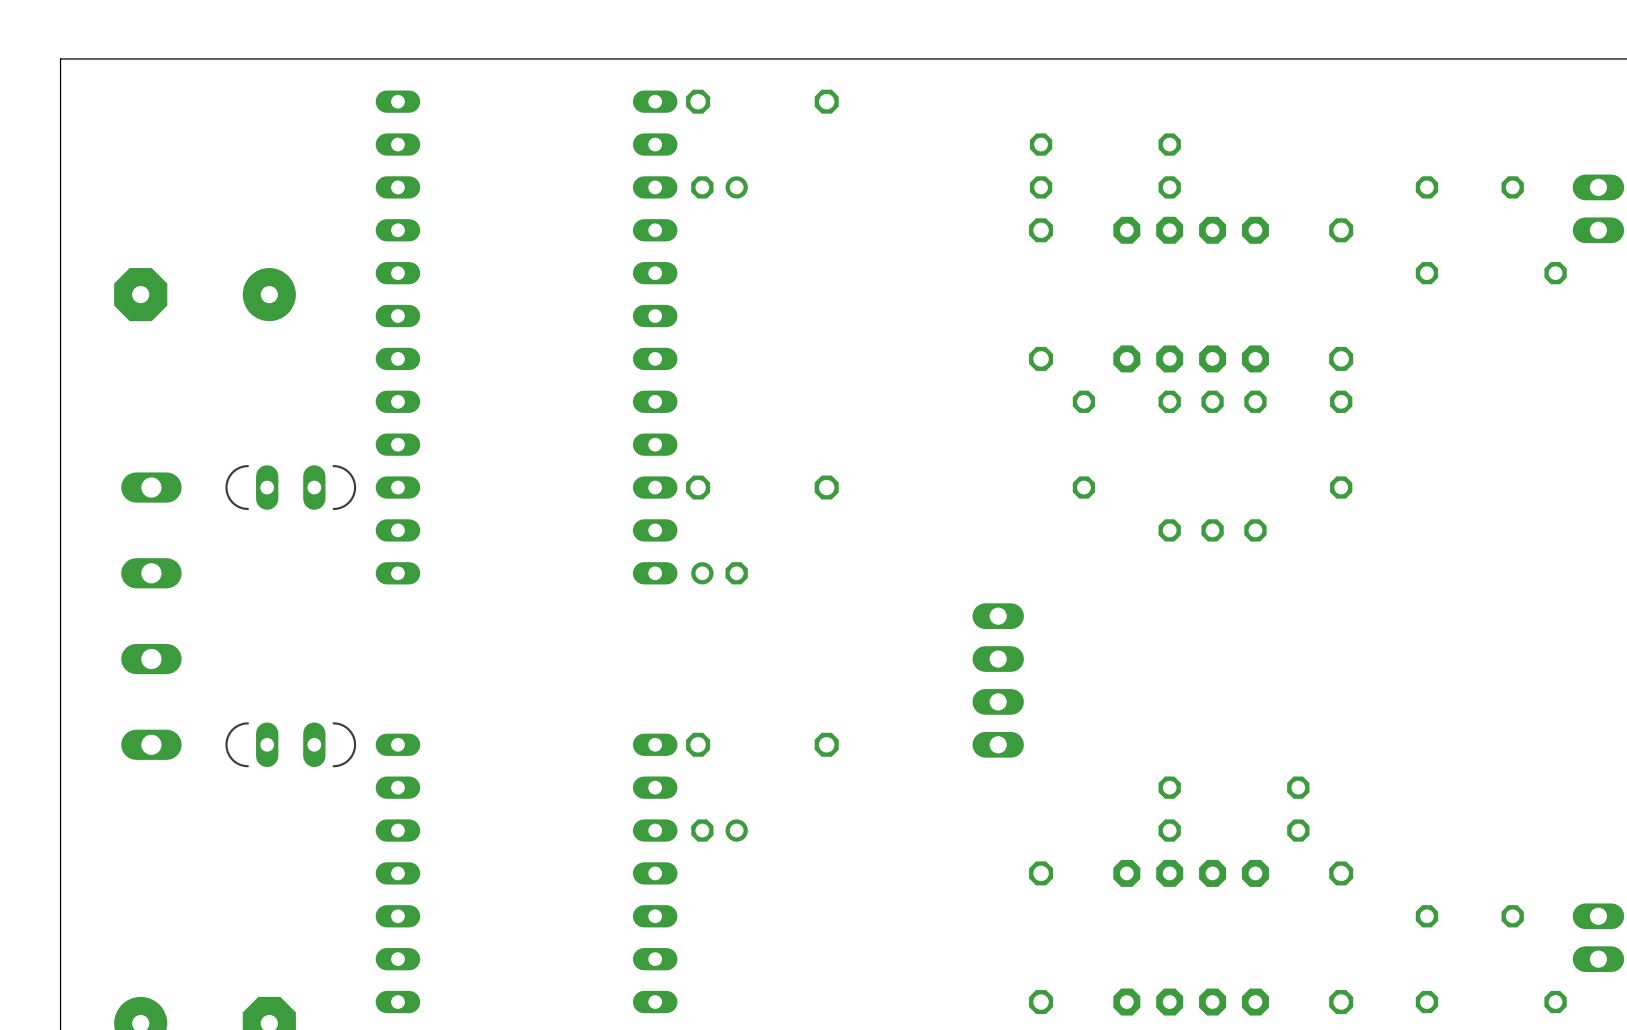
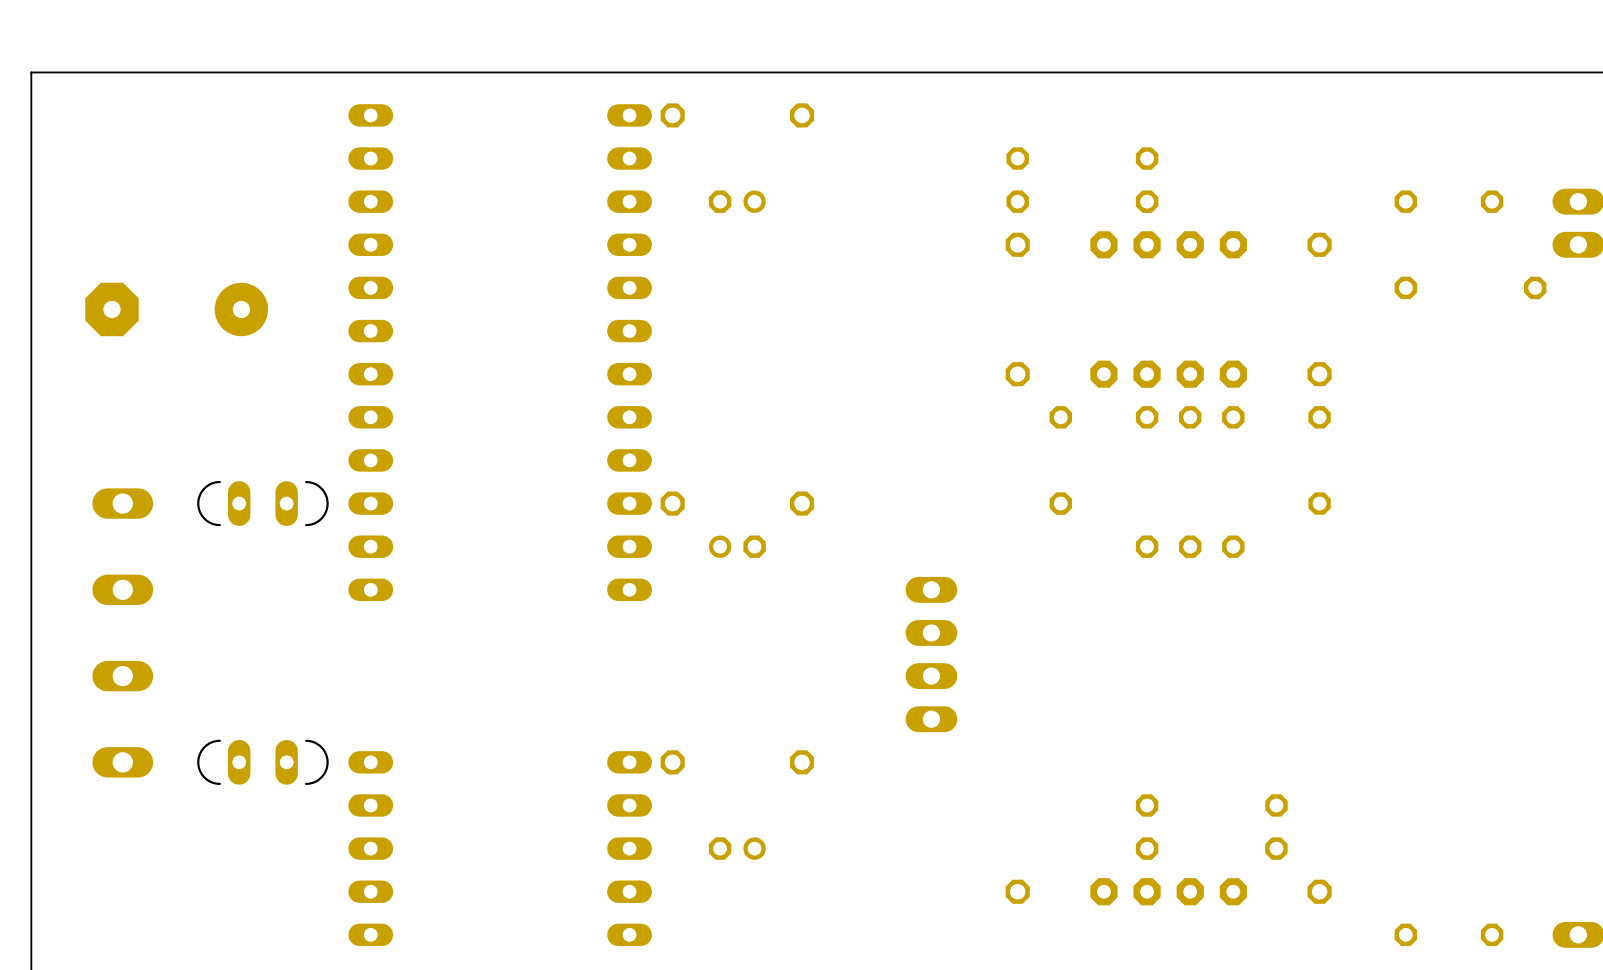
part position: (719, 187) -> (737, 201)
part position: (719, 573) -> (737, 546)
part: none -> (931, 611)
part: (998, 637) -> none
part: none -> (931, 697)
part: (998, 723) -> none
part position: (719, 830) -> (737, 848)

